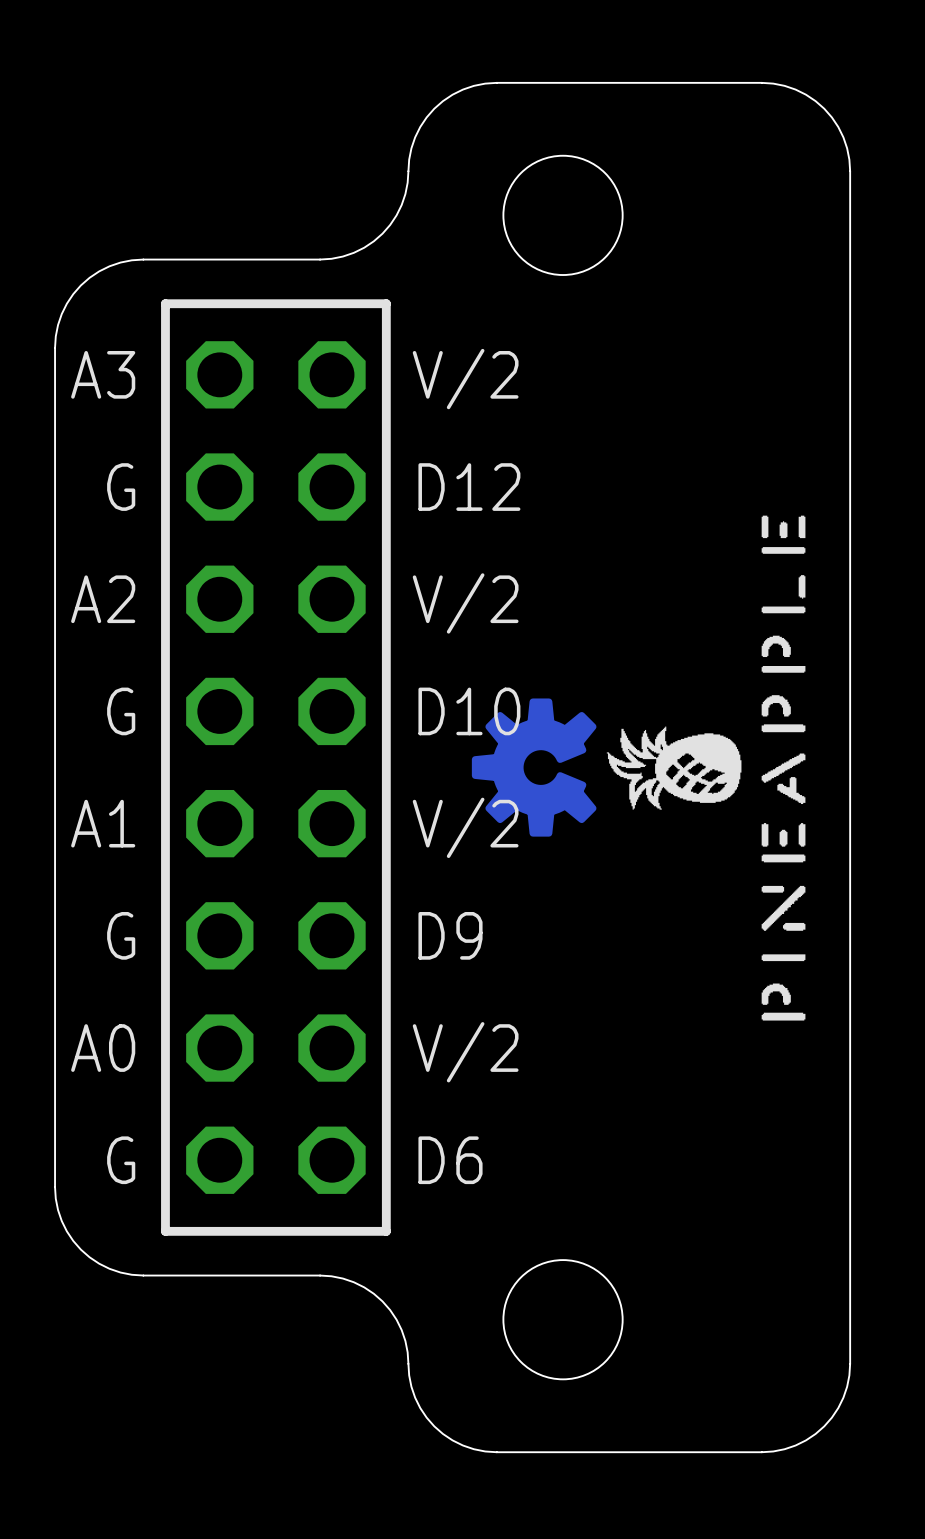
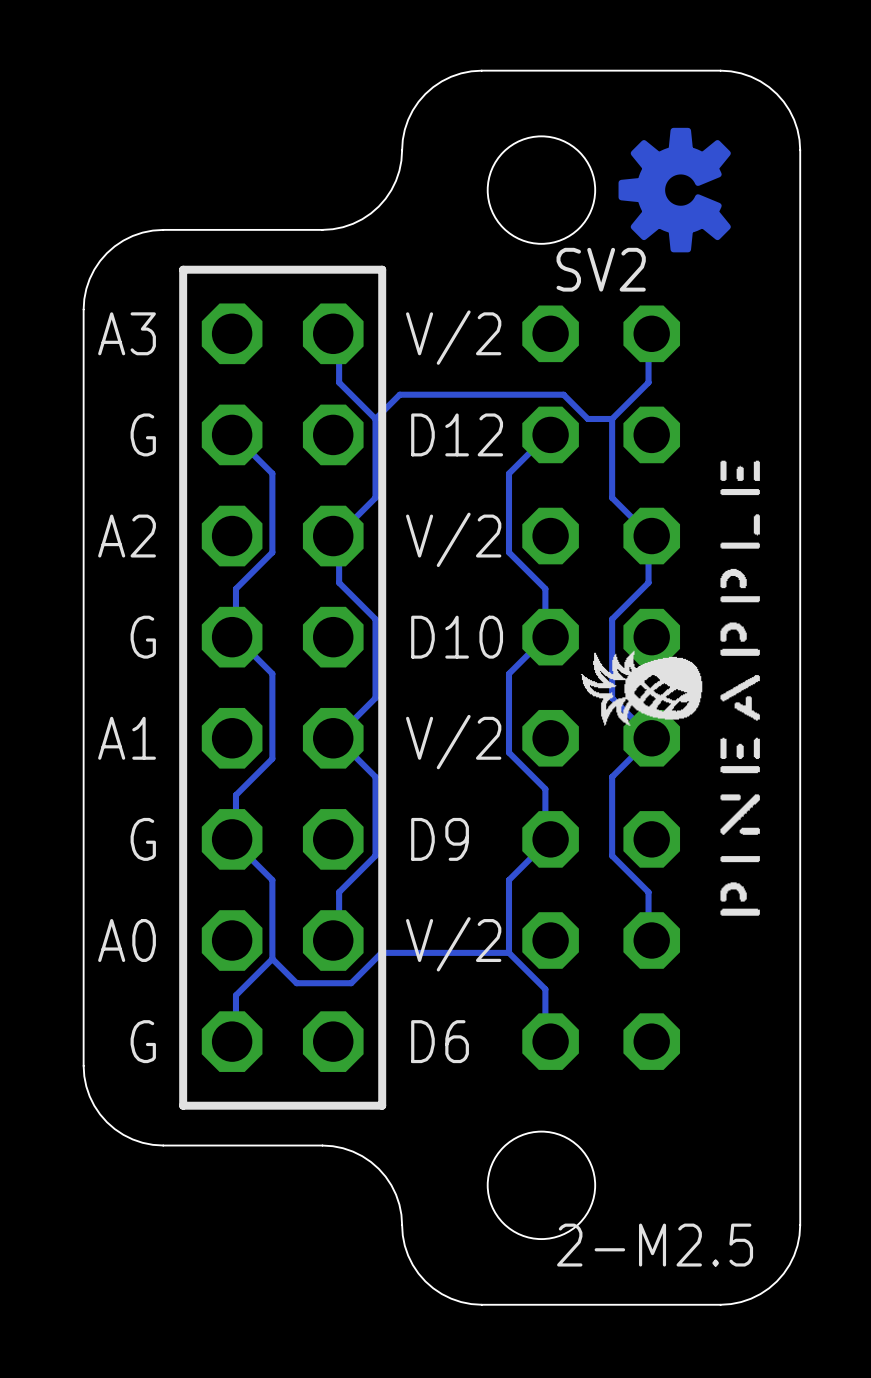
track: none -> (333, 333) (339, 334) (339, 382) (375, 418)
track: none -> (651, 333) (648, 334) (648, 382) (612, 418)
track: none -> (375, 418) (375, 497) (339, 534) (333, 536) (339, 540) (339, 582) (375, 619) (375, 698) (333, 738) (339, 740) (375, 776) (375, 855) (339, 892) (339, 934) (333, 940)
track: none -> (612, 418) (612, 497) (651, 536) (648, 540) (648, 582) (612, 619) (612, 698) (651, 738) (612, 776) (612, 855) (648, 892) (648, 934) (651, 940)
track: none -> (612, 418) (587, 418) (563, 394) (399, 394) (375, 418)
track: none -> (232, 434) (272, 473) (272, 552) (235, 588) (235, 631) (232, 637) (235, 637) (272, 673) (272, 758) (235, 795) (235, 837) (232, 839) (272, 880) (272, 958)
track: none -> (550, 434) (545, 437) (508, 473) (508, 552) (545, 588) (545, 631) (550, 637) (545, 637) (508, 673) (508, 752) (545, 789) (545, 837) (550, 839) (508, 880) (508, 952)
drawing position: (534, 767) -> (674, 190)
SV2: none -> (601, 687)
track: none -> (508, 952) (545, 989) (545, 1037) (550, 1041)
track: none -> (508, 952) (381, 952) (351, 983) (296, 983) (272, 958)
track: none -> (272, 958) (235, 995) (235, 1037) (232, 1041)
text: none -> 2-M2.5 (655, 1245)

